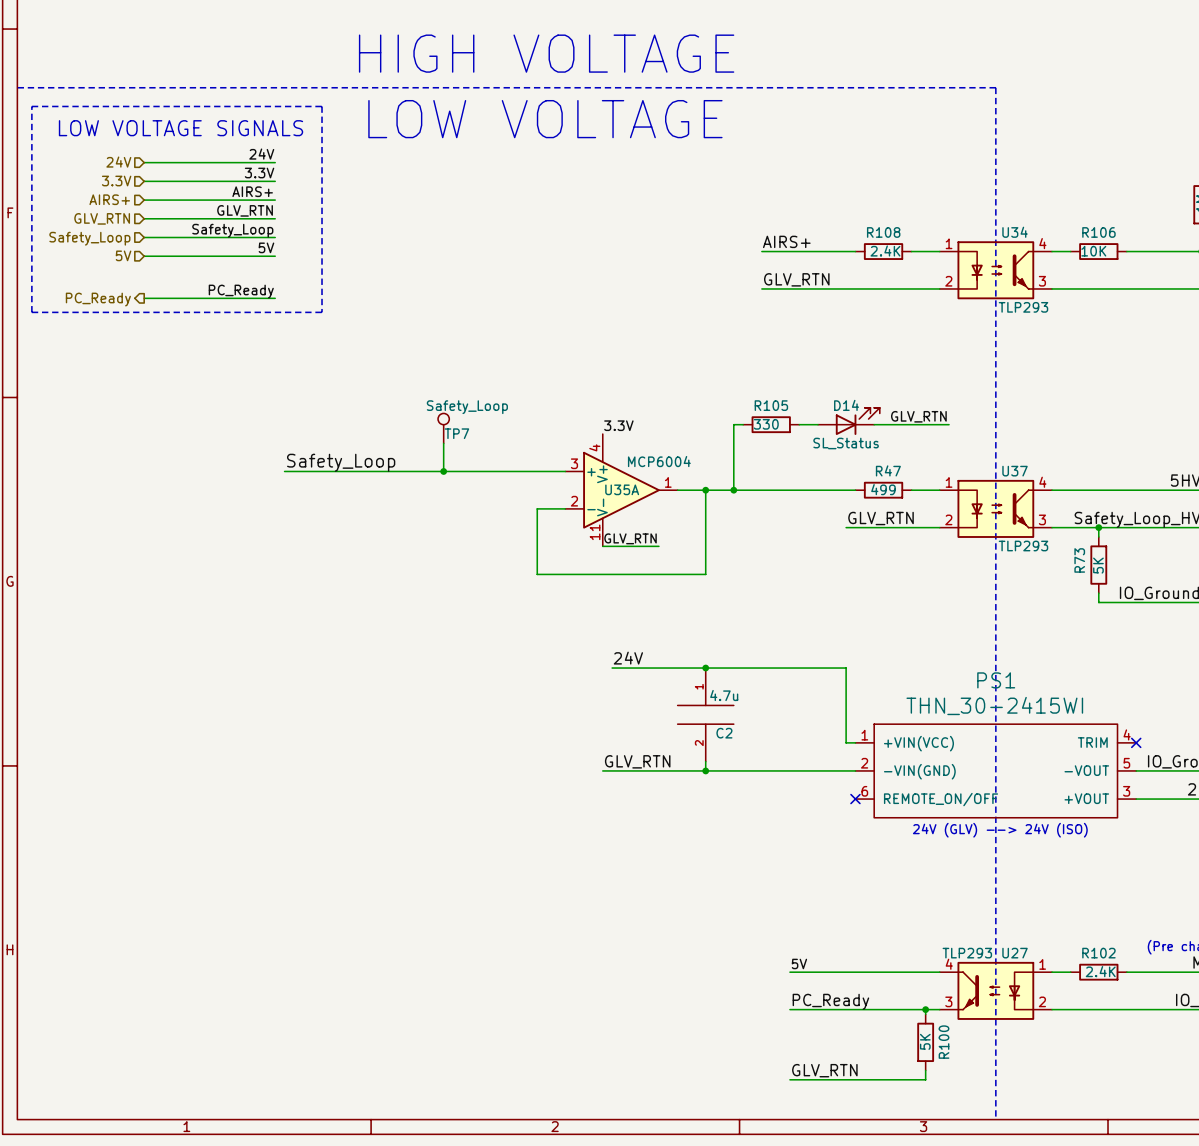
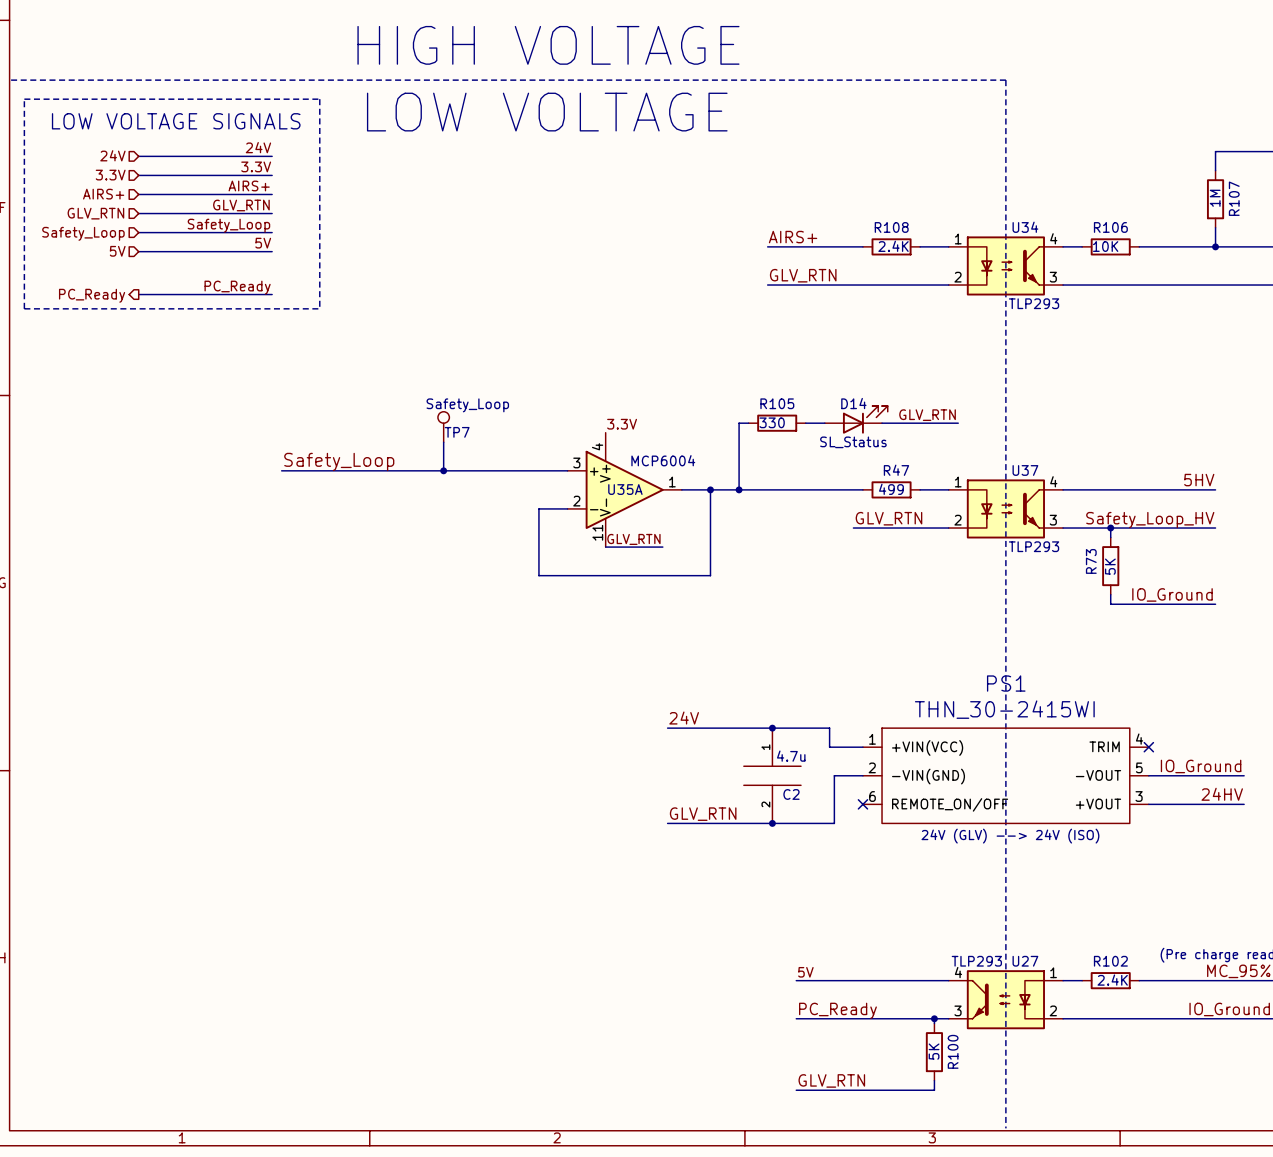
label position: 24V (628, 658) -> 24V (684, 718)
wire: (612, 668) (846, 668) (846, 742) -> (667, 728) (829, 728) (829, 747) (853, 747)
junction: (705, 668) -> none
C2 position: (705, 714) -> (772, 775)
junction: none -> (772, 728)
label position: GLV_RTN (637, 761) -> GLV_RTN (703, 814)
wire: (705, 761) (705, 770) -> none
wire: (602, 770) (827, 770) -> (667, 823) (834, 823) (834, 775)
junction: (705, 770) -> none
junction: none -> (772, 823)

